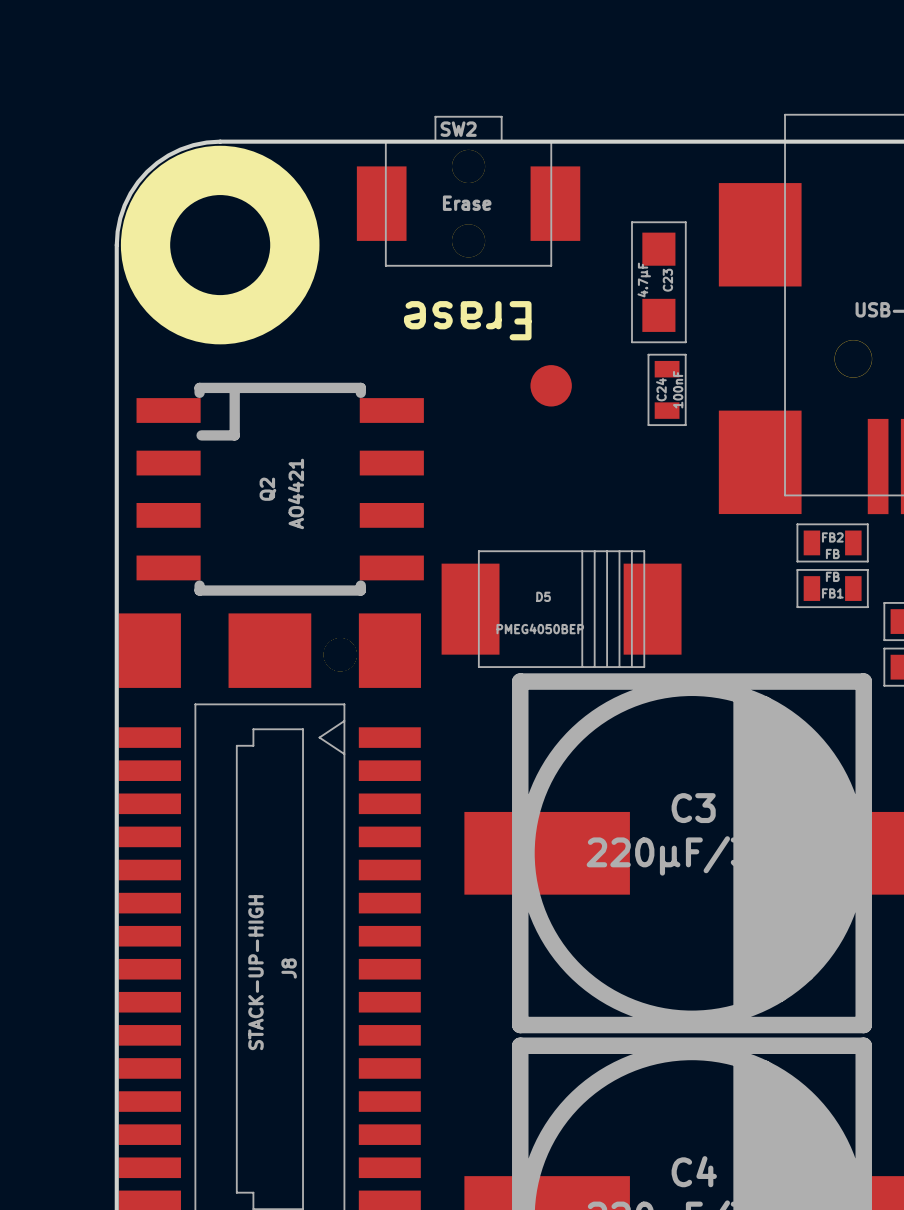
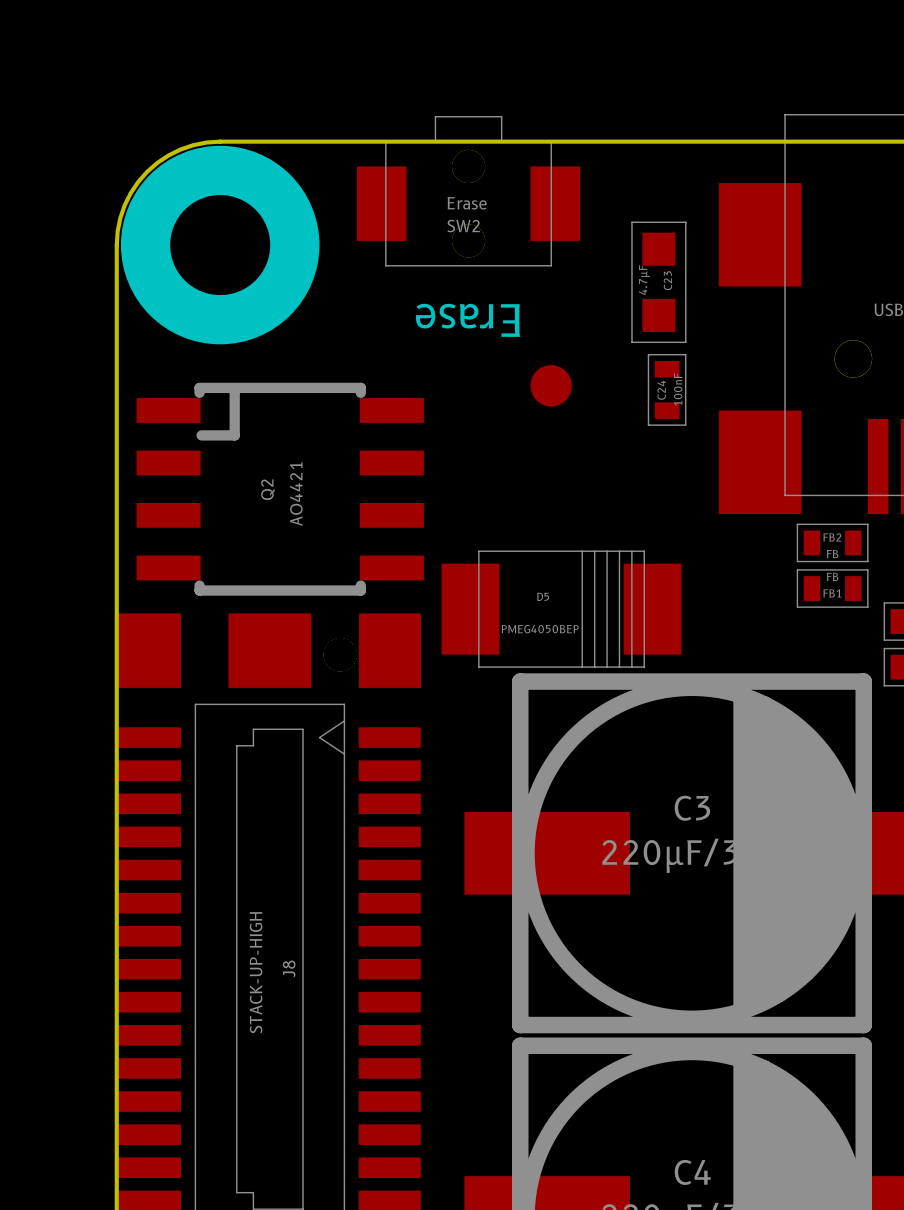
SW2 name position: SW2 (458, 129) -> SW2 (463, 226)

